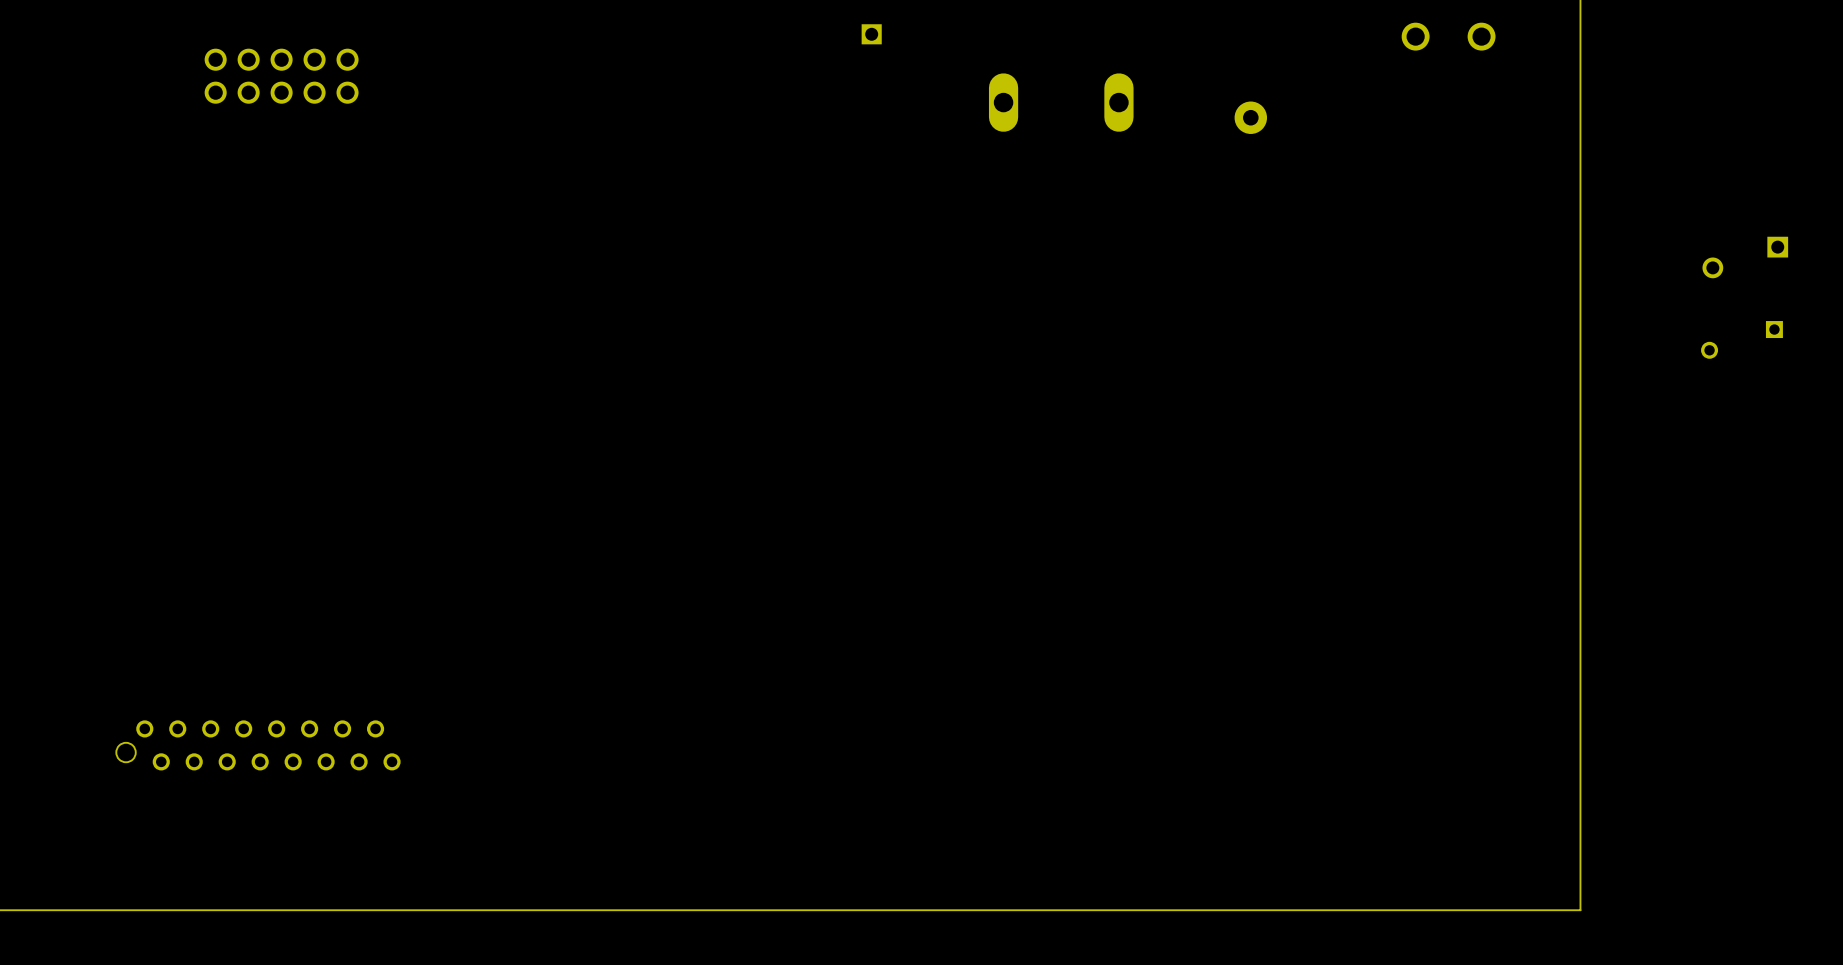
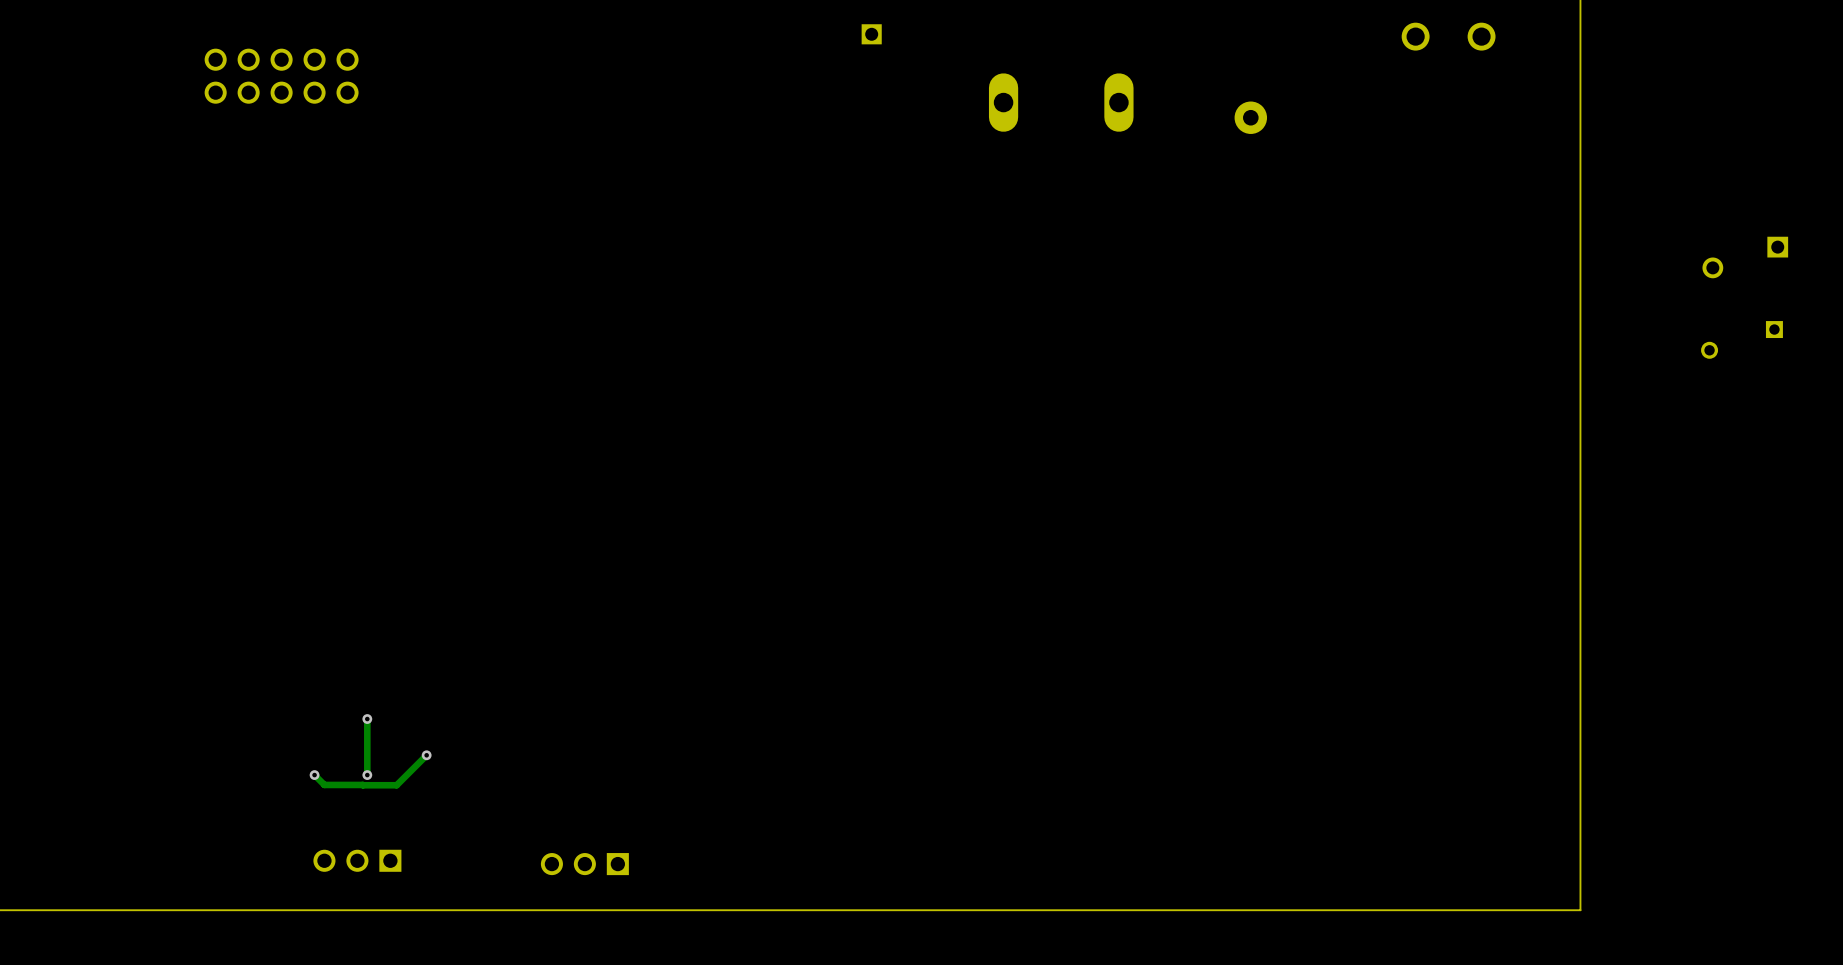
track: none -> (367, 719) (367, 775)
via: none -> (367, 719)
part: (258, 745) -> none
track: none -> (426, 755) (396, 785) (324, 784) (314, 775)
via: none -> (426, 755)
via: none -> (314, 775)
via: none -> (367, 775)
part: none -> (357, 860)
part: none -> (584, 864)

